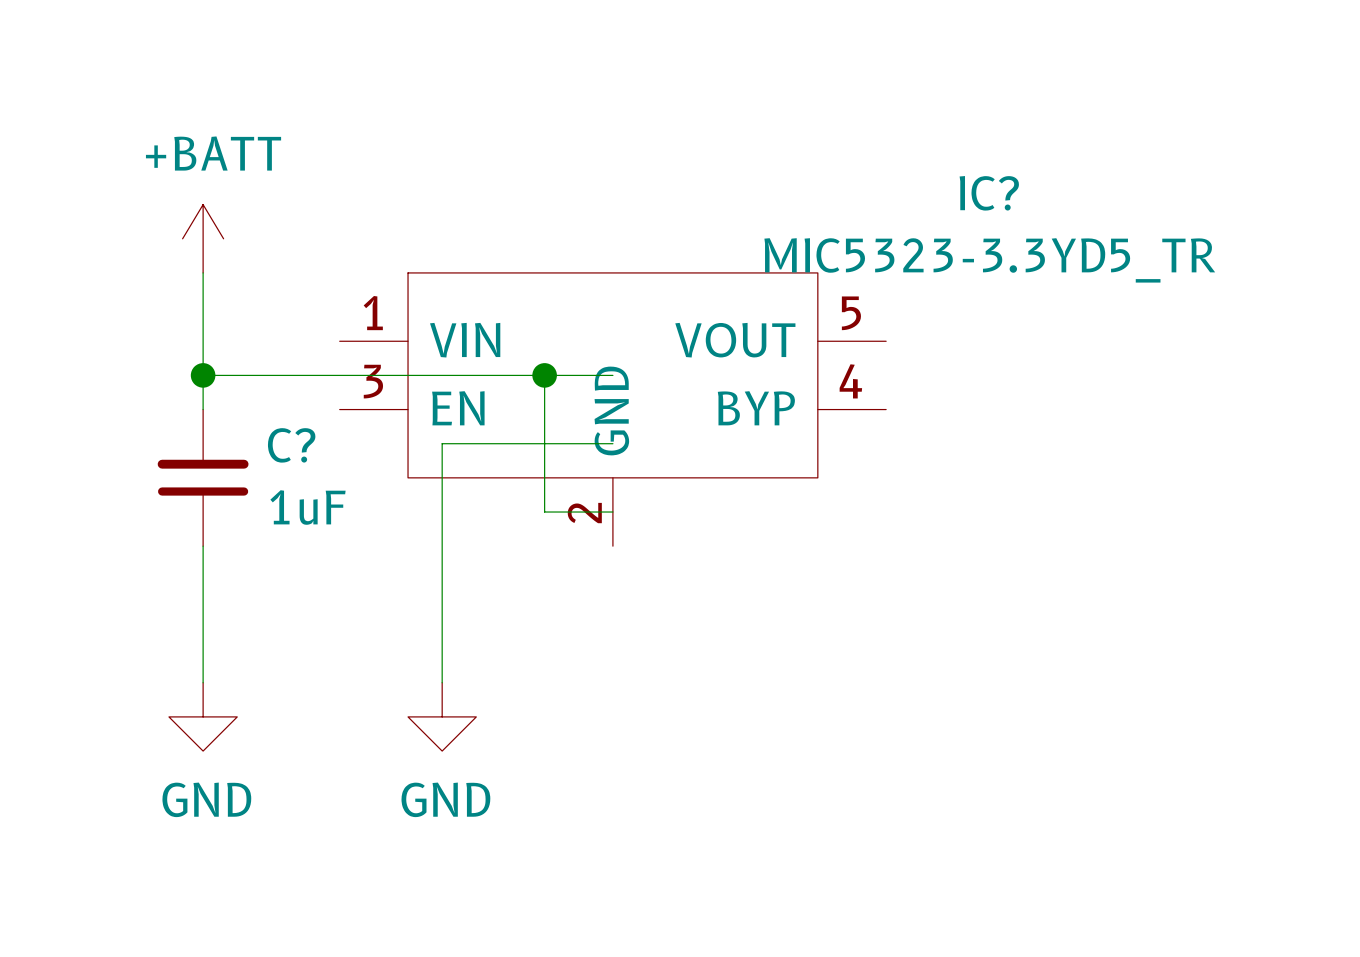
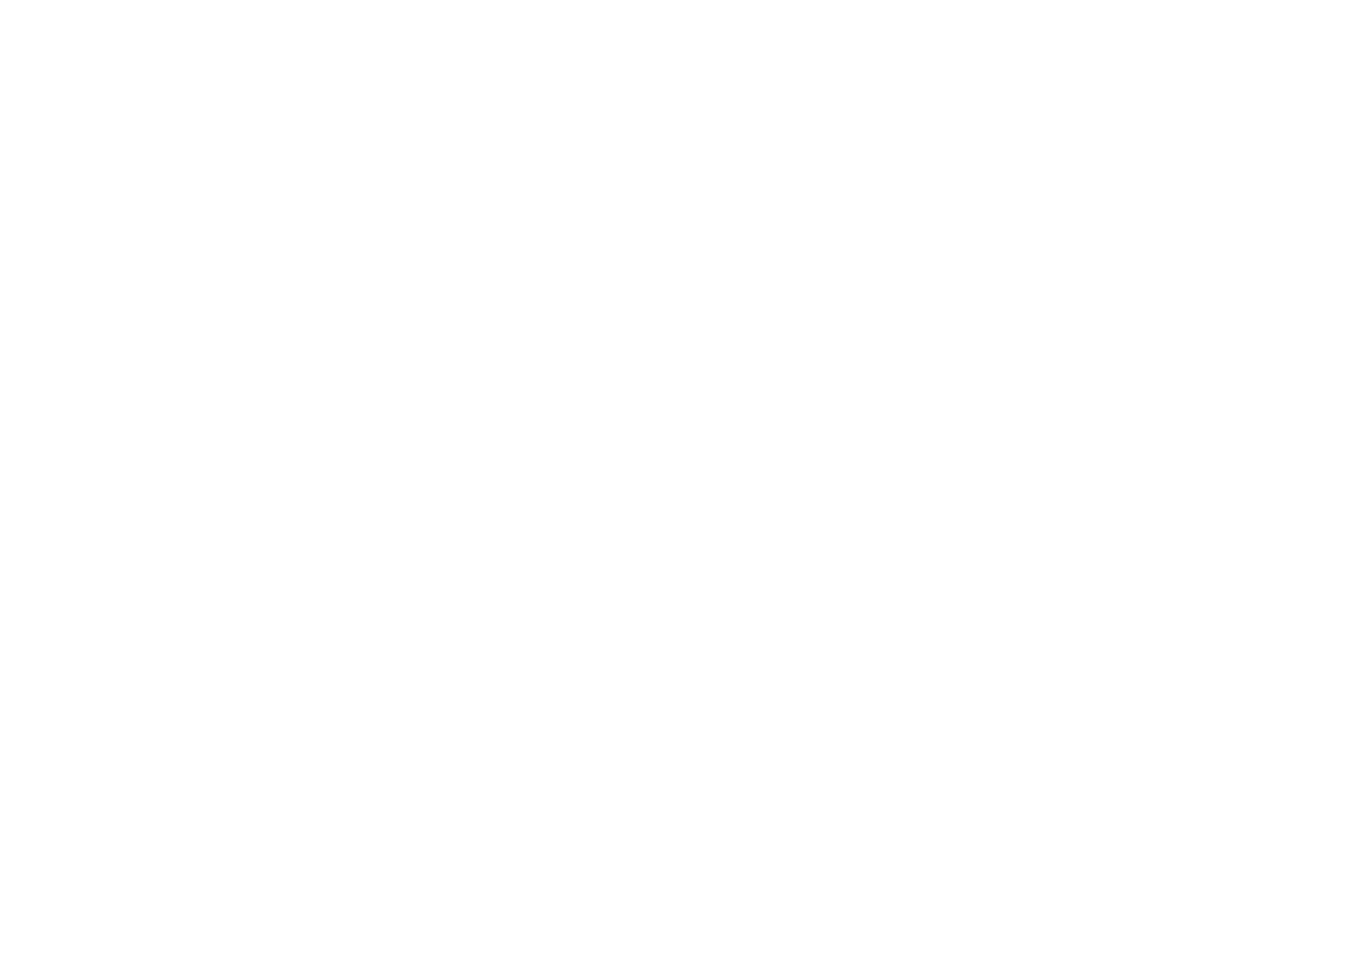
power symbol: +BATT (203, 238) -> none
wire: (203, 272) (203, 409) -> none
wire: (203, 375) (612, 375) -> none
junction: (203, 375) -> none
wire: (544, 375) (544, 512) (612, 512) -> none
junction: (544, 375) -> none
IC?: MIC5323-3.3YD5_TR (612, 409) -> none
wire: (612, 443) (442, 443) (442, 682) -> none
C?: 1uF (203, 477) -> none
wire: (203, 546) (203, 682) -> none
power symbol: GND (203, 716) -> none
power symbol: GND (442, 716) -> none

